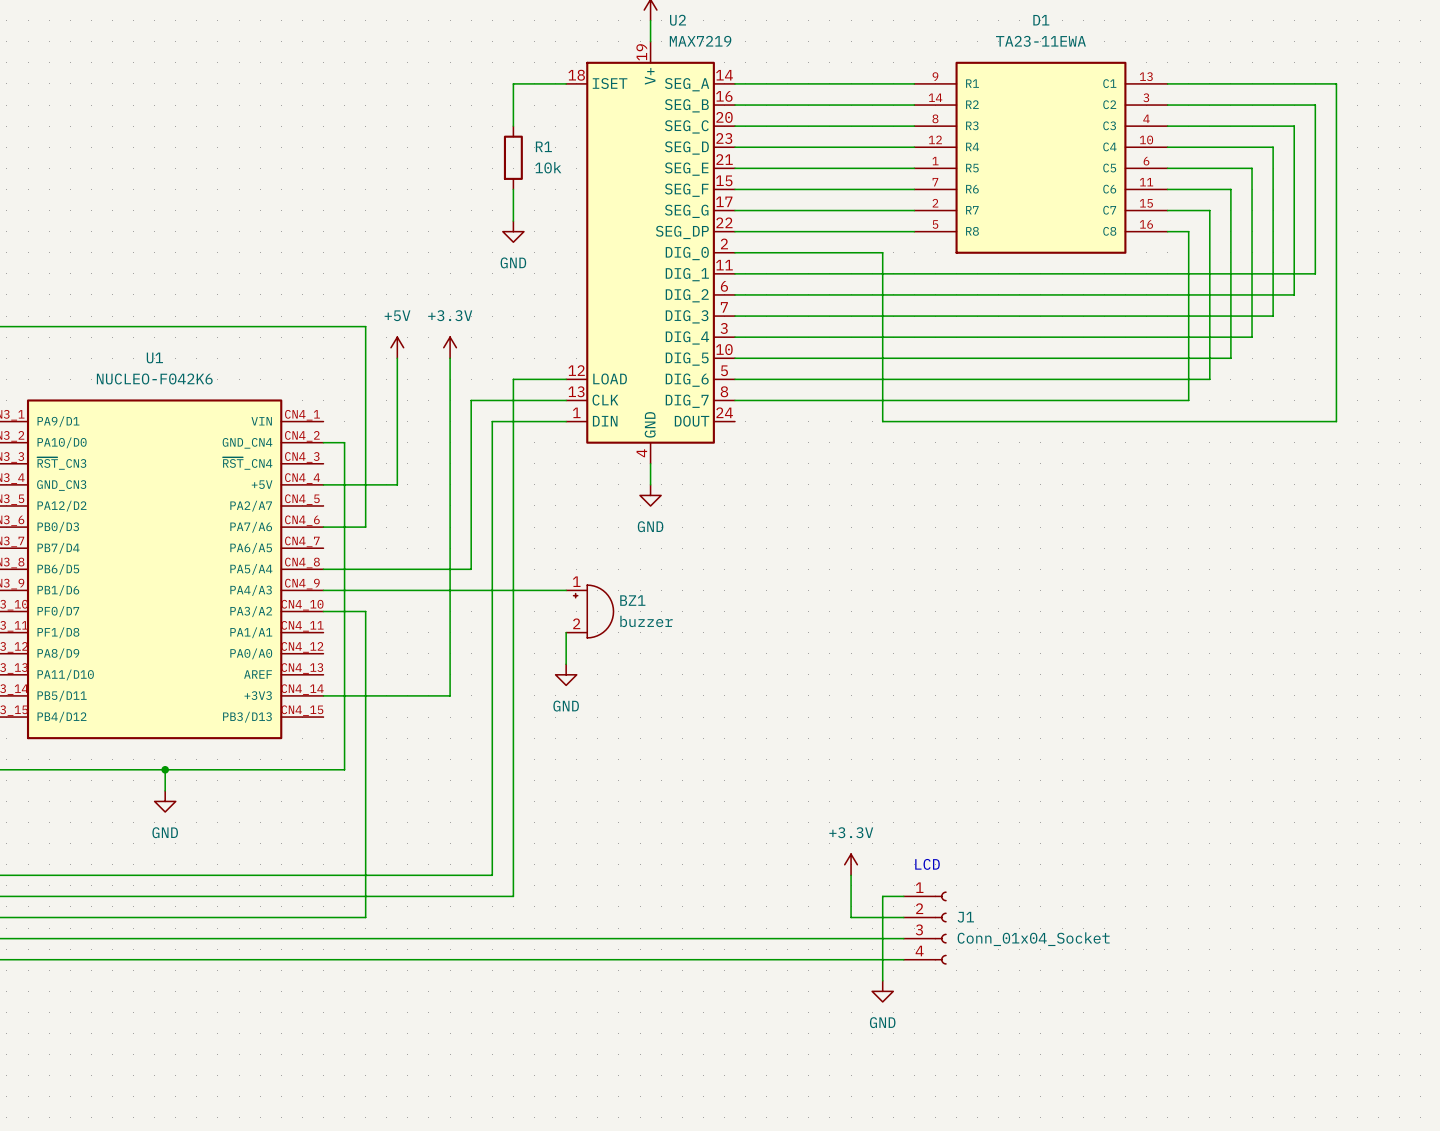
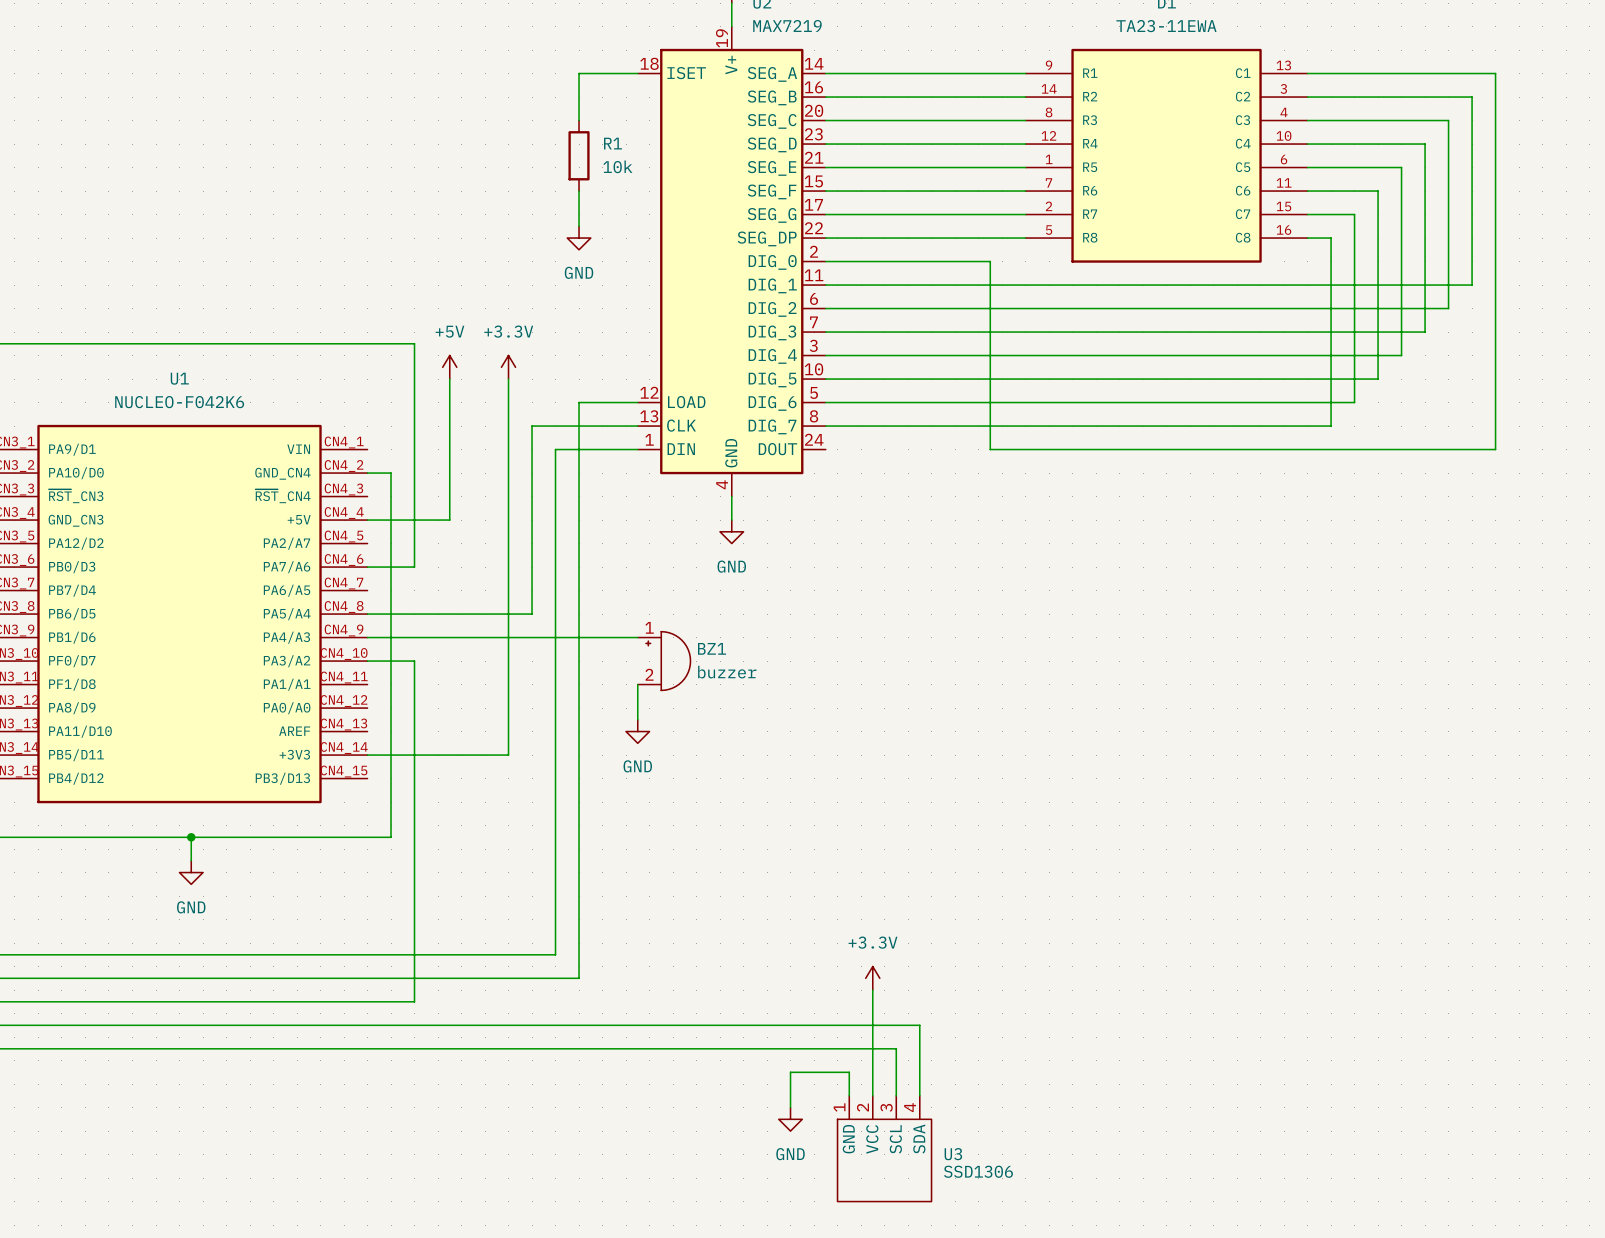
power symbol position: +3.3V (851, 864) -> +3.3V (872, 978)
text: LCD (927, 864) -> none
wire: (851, 875) (851, 917) (903, 917) -> none
wire: (903, 896) (882, 896) (882, 980) -> none
wire: none -> (872, 990) (872, 1095)
J1: Conn_01x04_Socket (925, 928) -> none
wire: (819, 938) (903, 938) -> (919, 1025) (919, 1095)
wire: (798, 959) (903, 959) -> (896, 1048) (896, 1095)
power symbol position: GND (882, 991) -> GND (790, 1119)
wire: none -> (849, 1095) (849, 1072) (790, 1072) (790, 1107)
U3: none -> SSD1306 (884, 1148)

